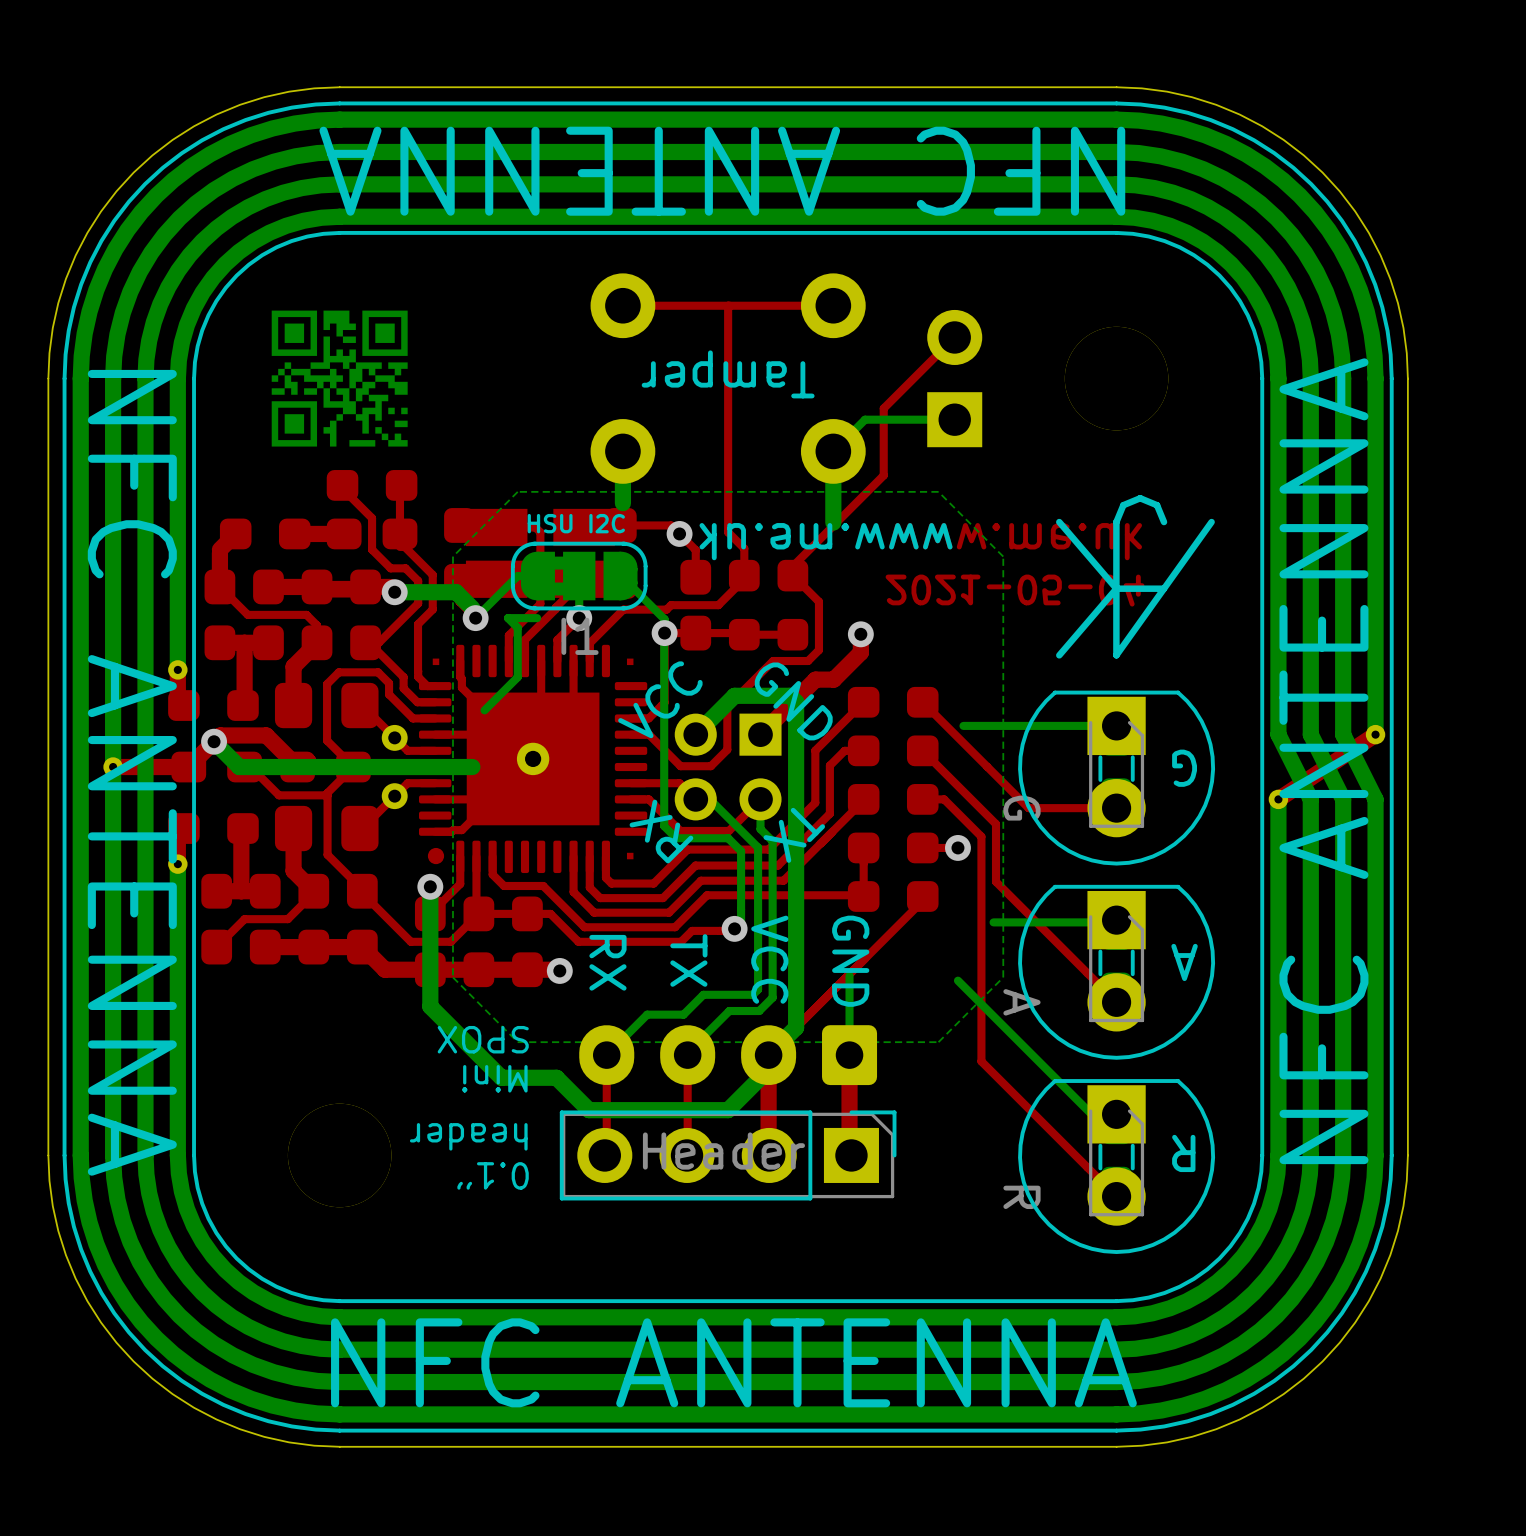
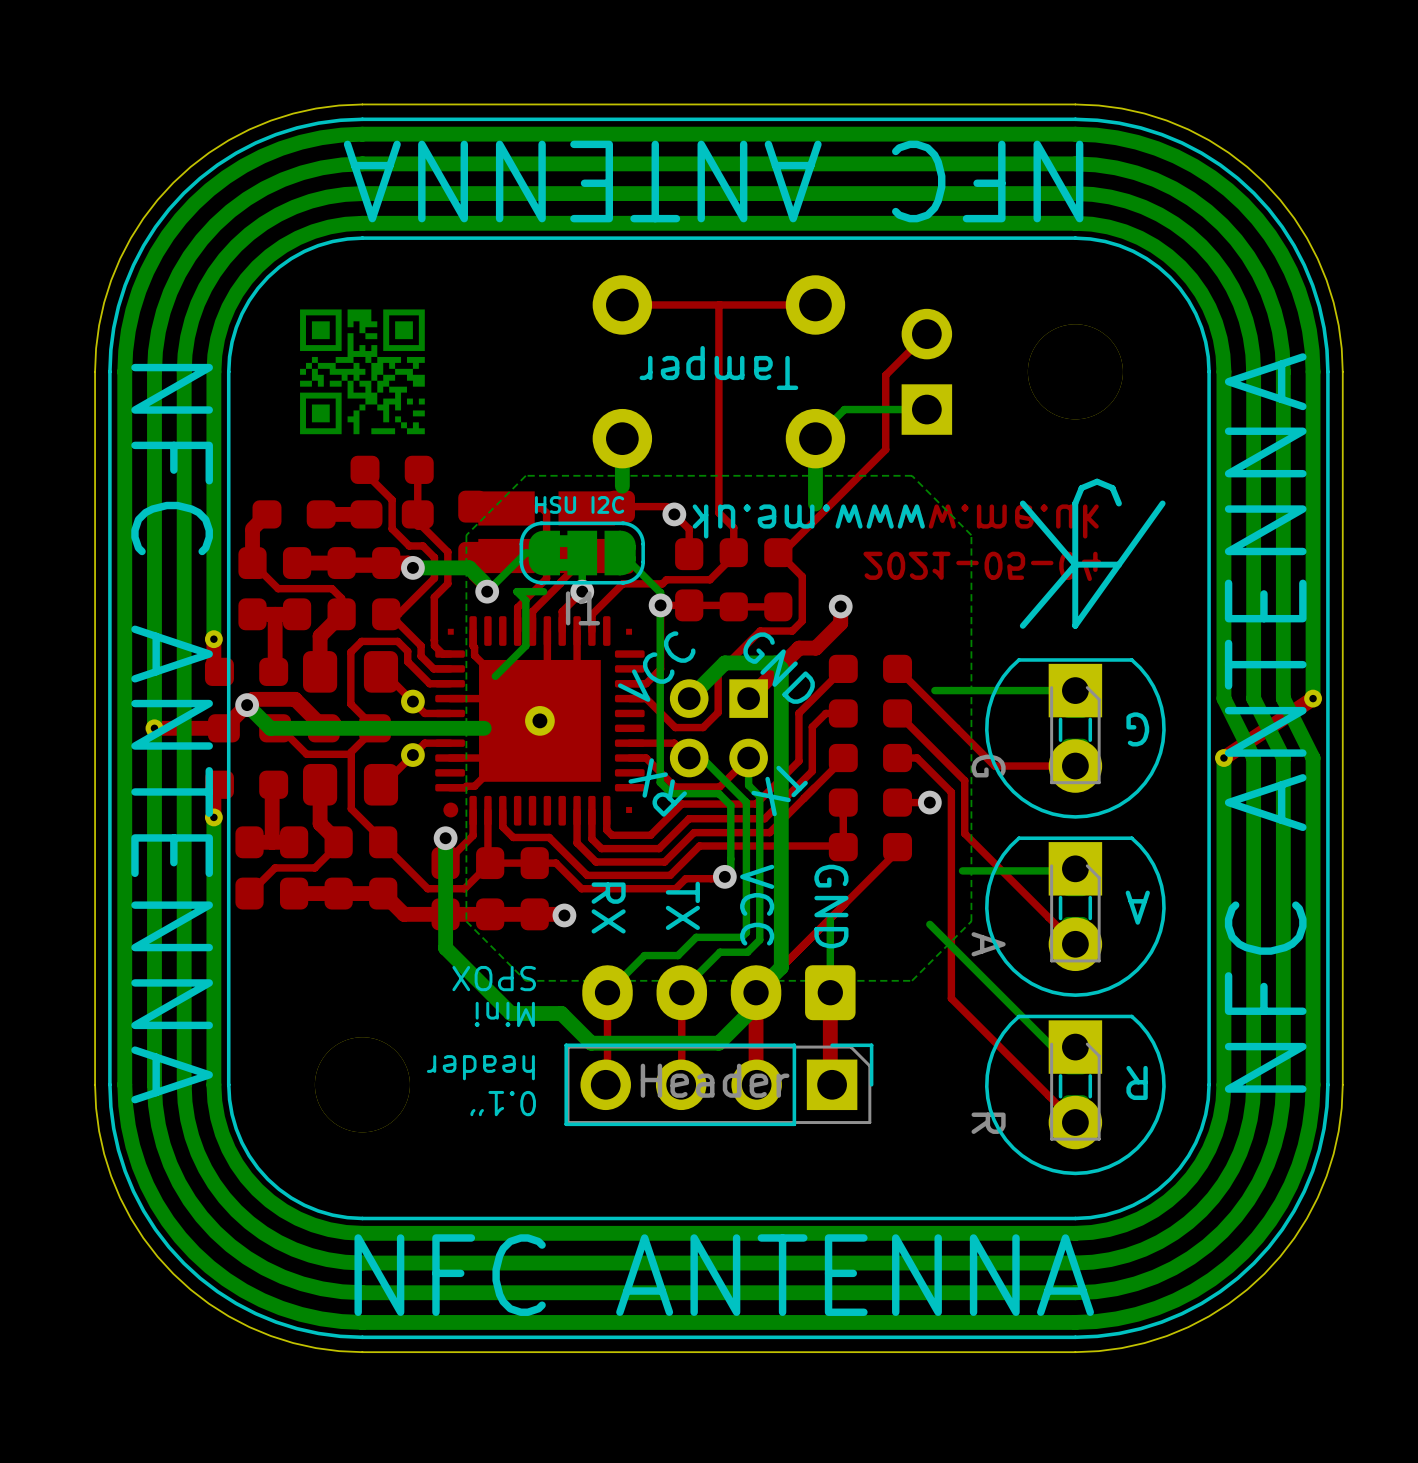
top track: (909, 382) (883, 408) (883, 475) (792, 566) (792, 575) -> (885, 375) (885, 449) (782, 552) (778, 552)

